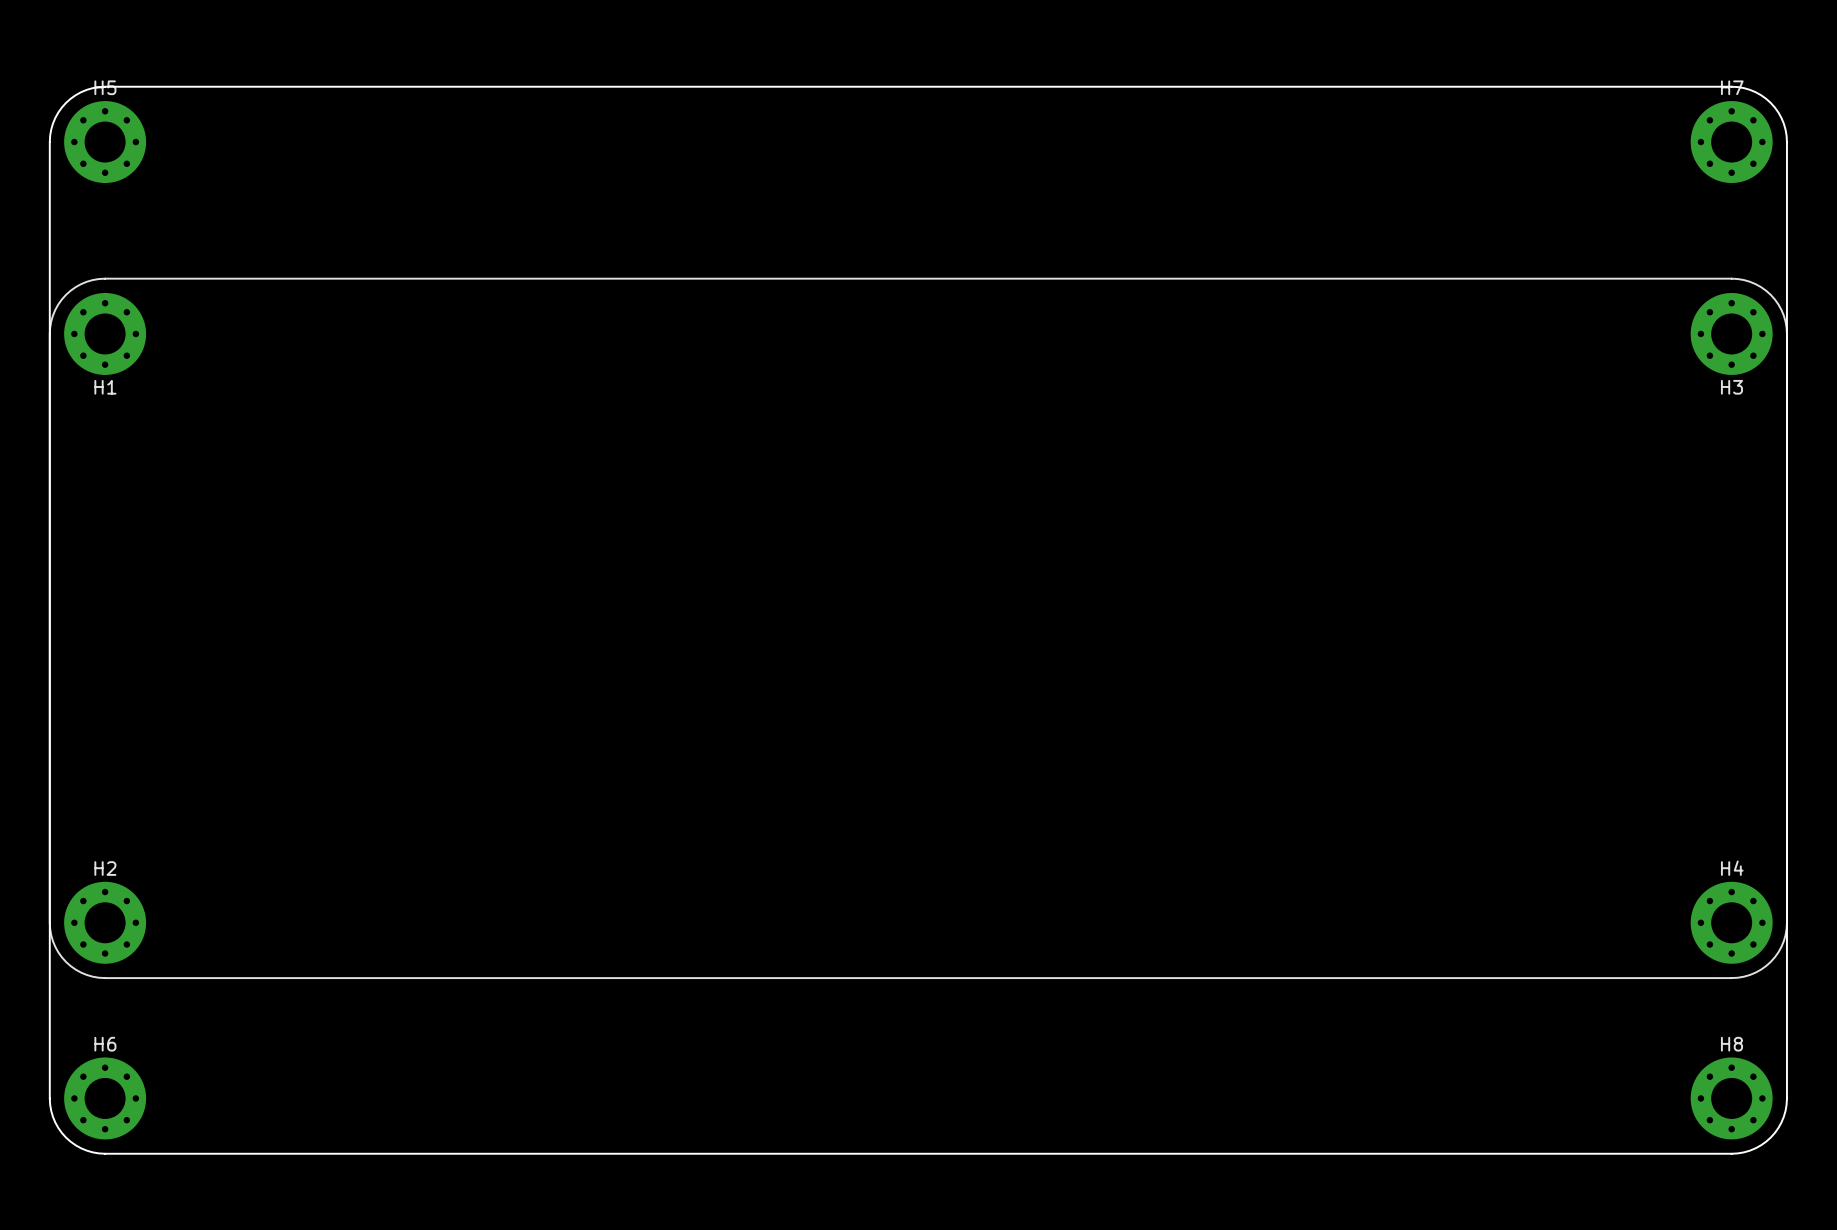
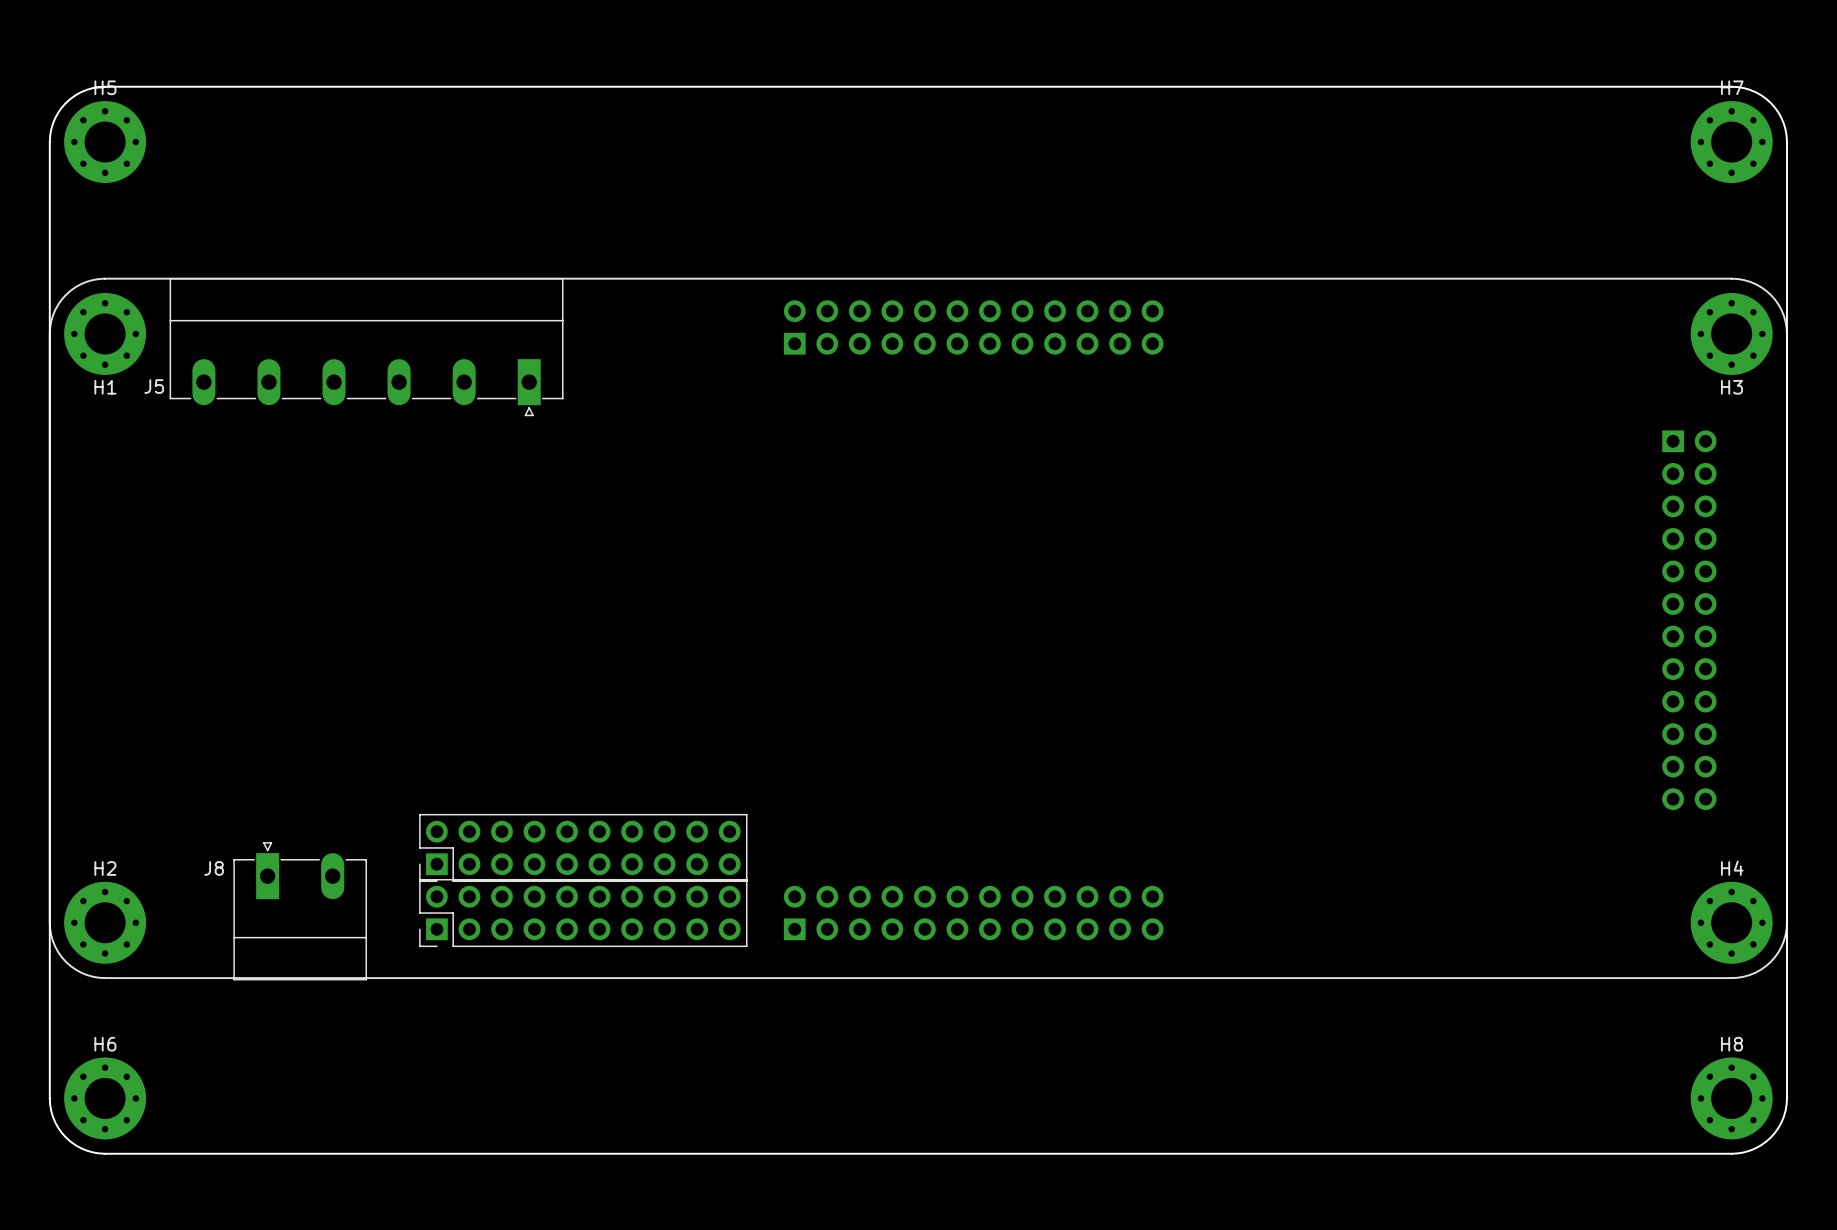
part: none -> (973, 327)
J5: none -> (366, 347)
part: none -> (1689, 620)
part: none -> (583, 847)
J8: none -> (300, 911)
part: none -> (583, 913)
part: none -> (973, 913)

